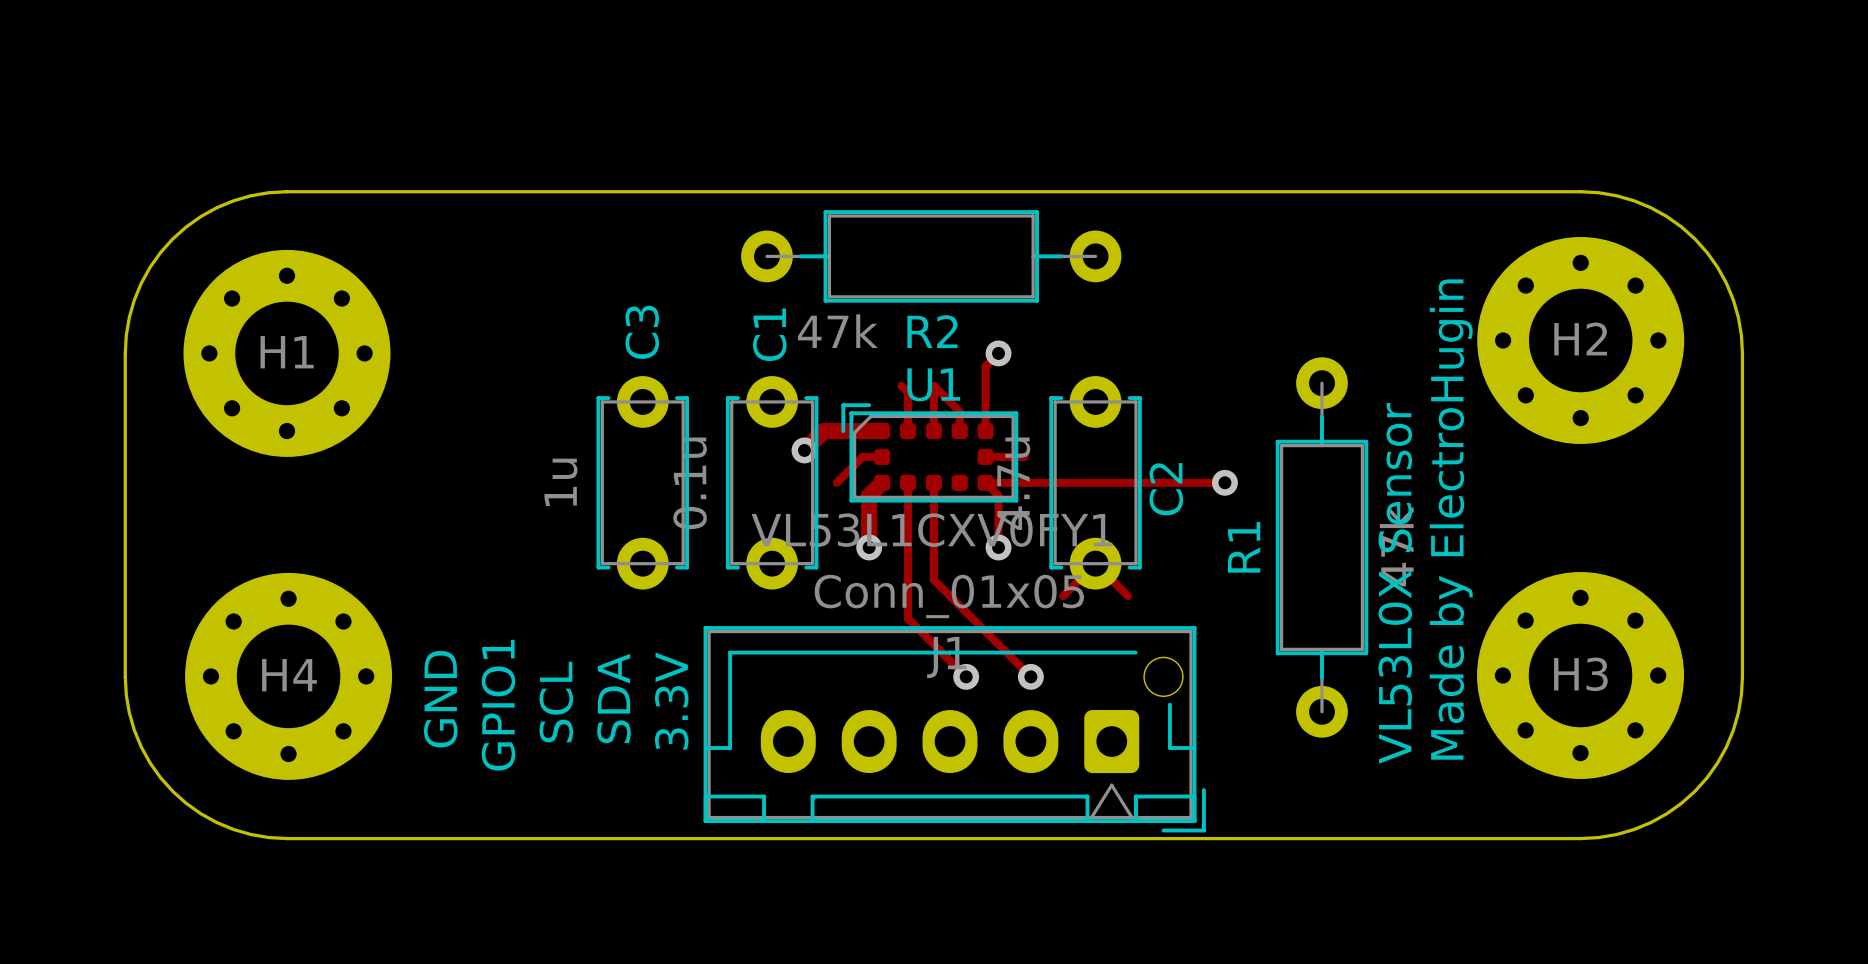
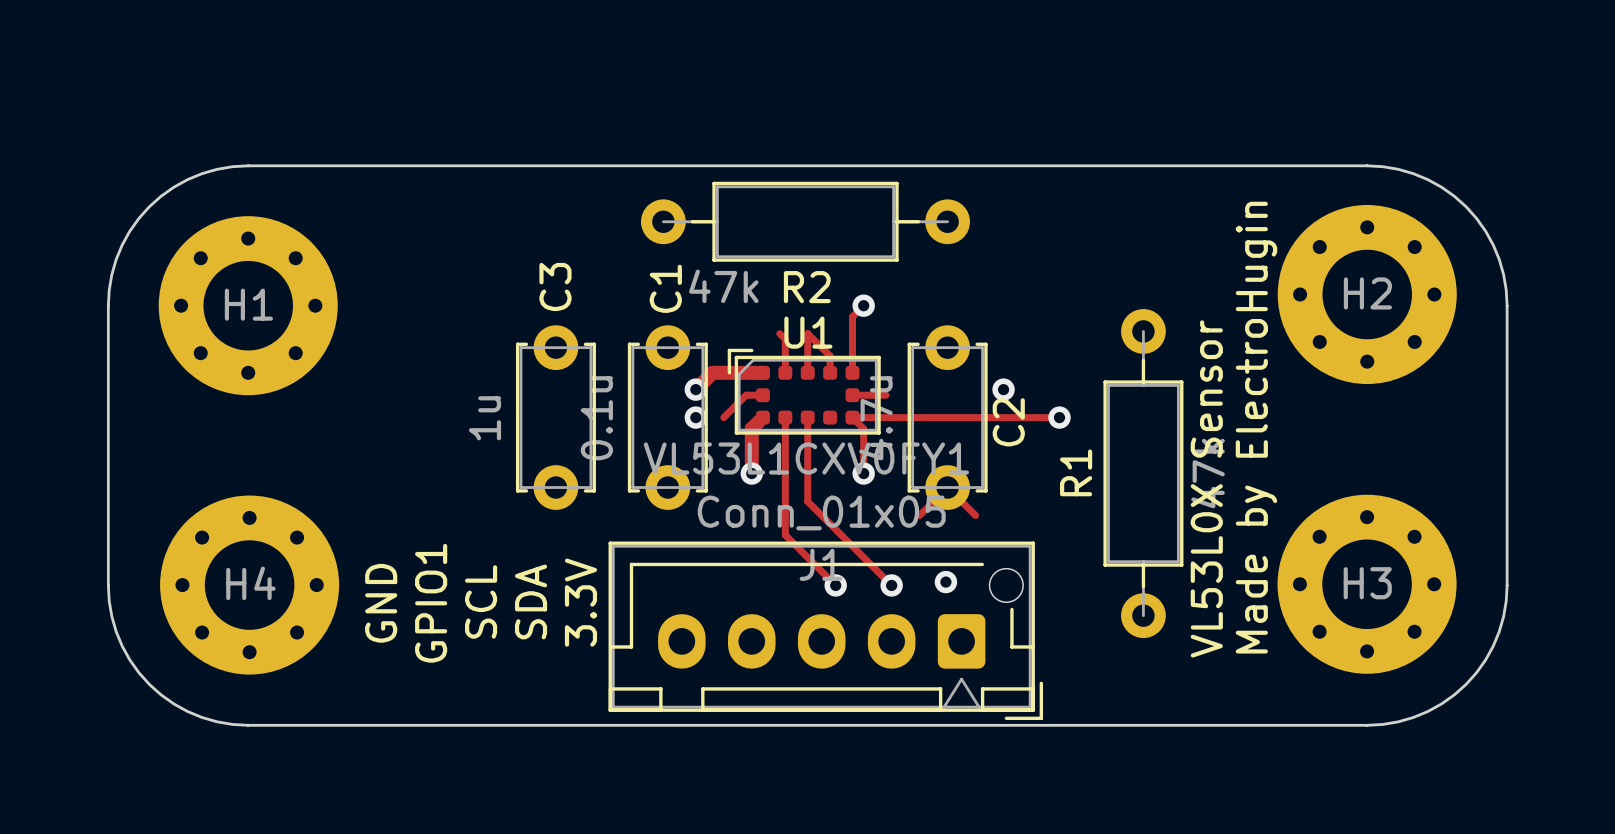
via: none -> (1003, 389)
via: none -> (695, 417)
via: none -> (945, 582)

